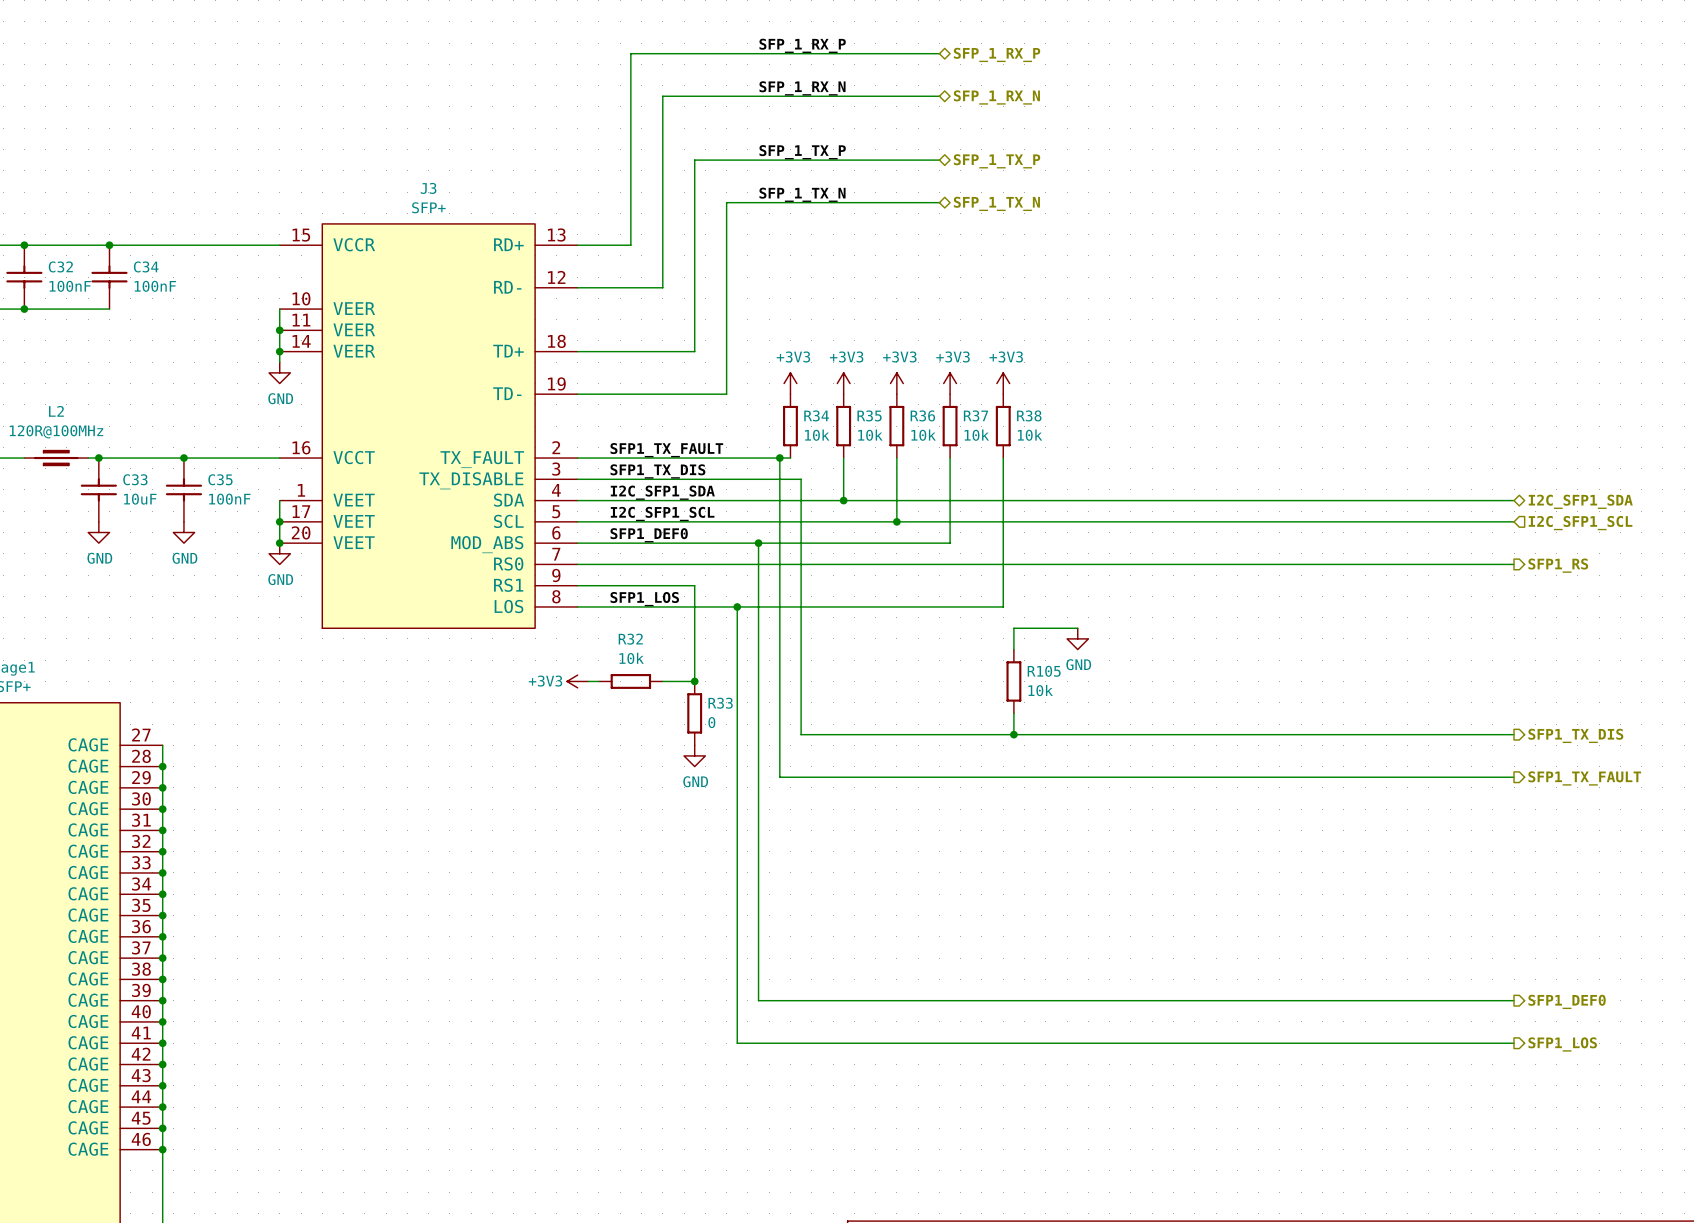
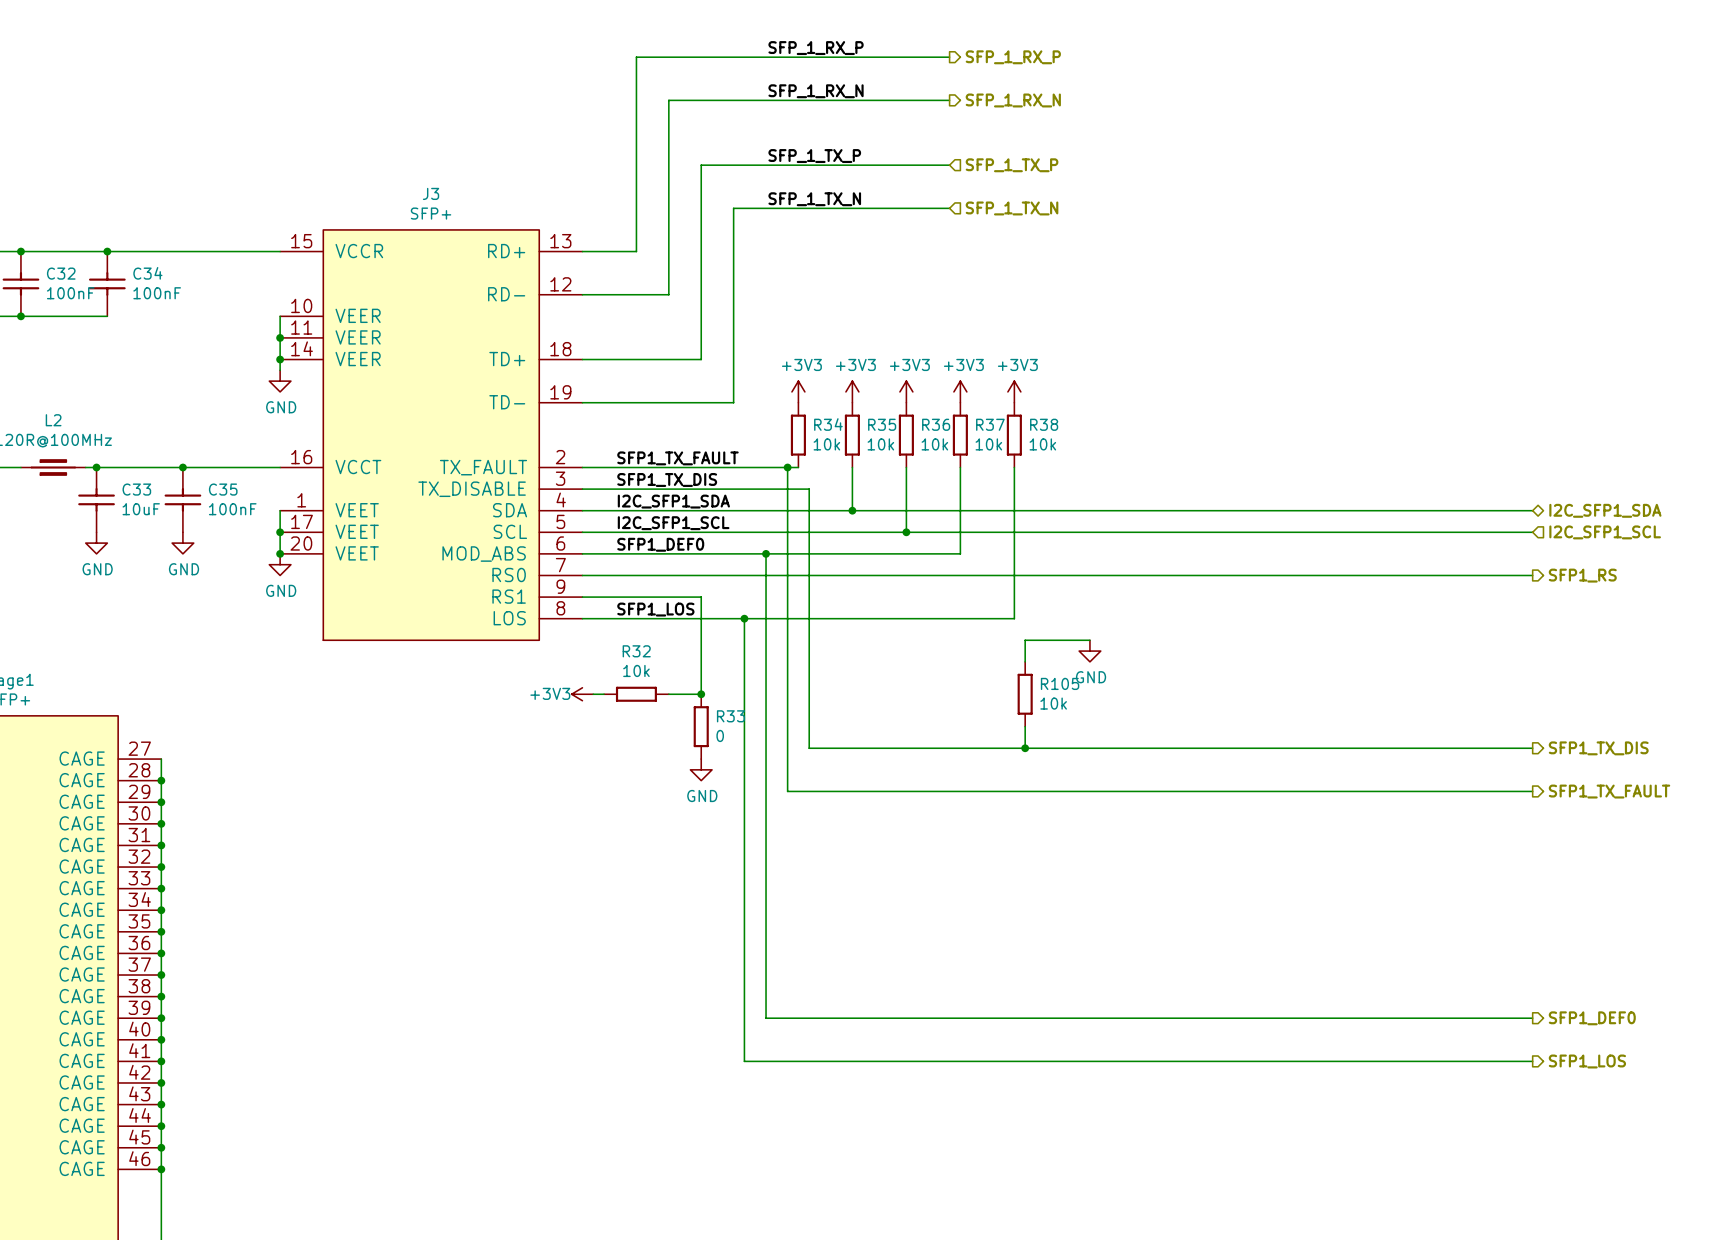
hierarchical label shape: bidirectional (997, 54) -> output (1013, 57)
hierarchical label shape: bidirectional (996, 97) -> output (1013, 100)
hierarchical label shape: bidirectional (997, 161) -> input (1012, 165)
hierarchical label shape: bidirectional (996, 203) -> input (1012, 208)

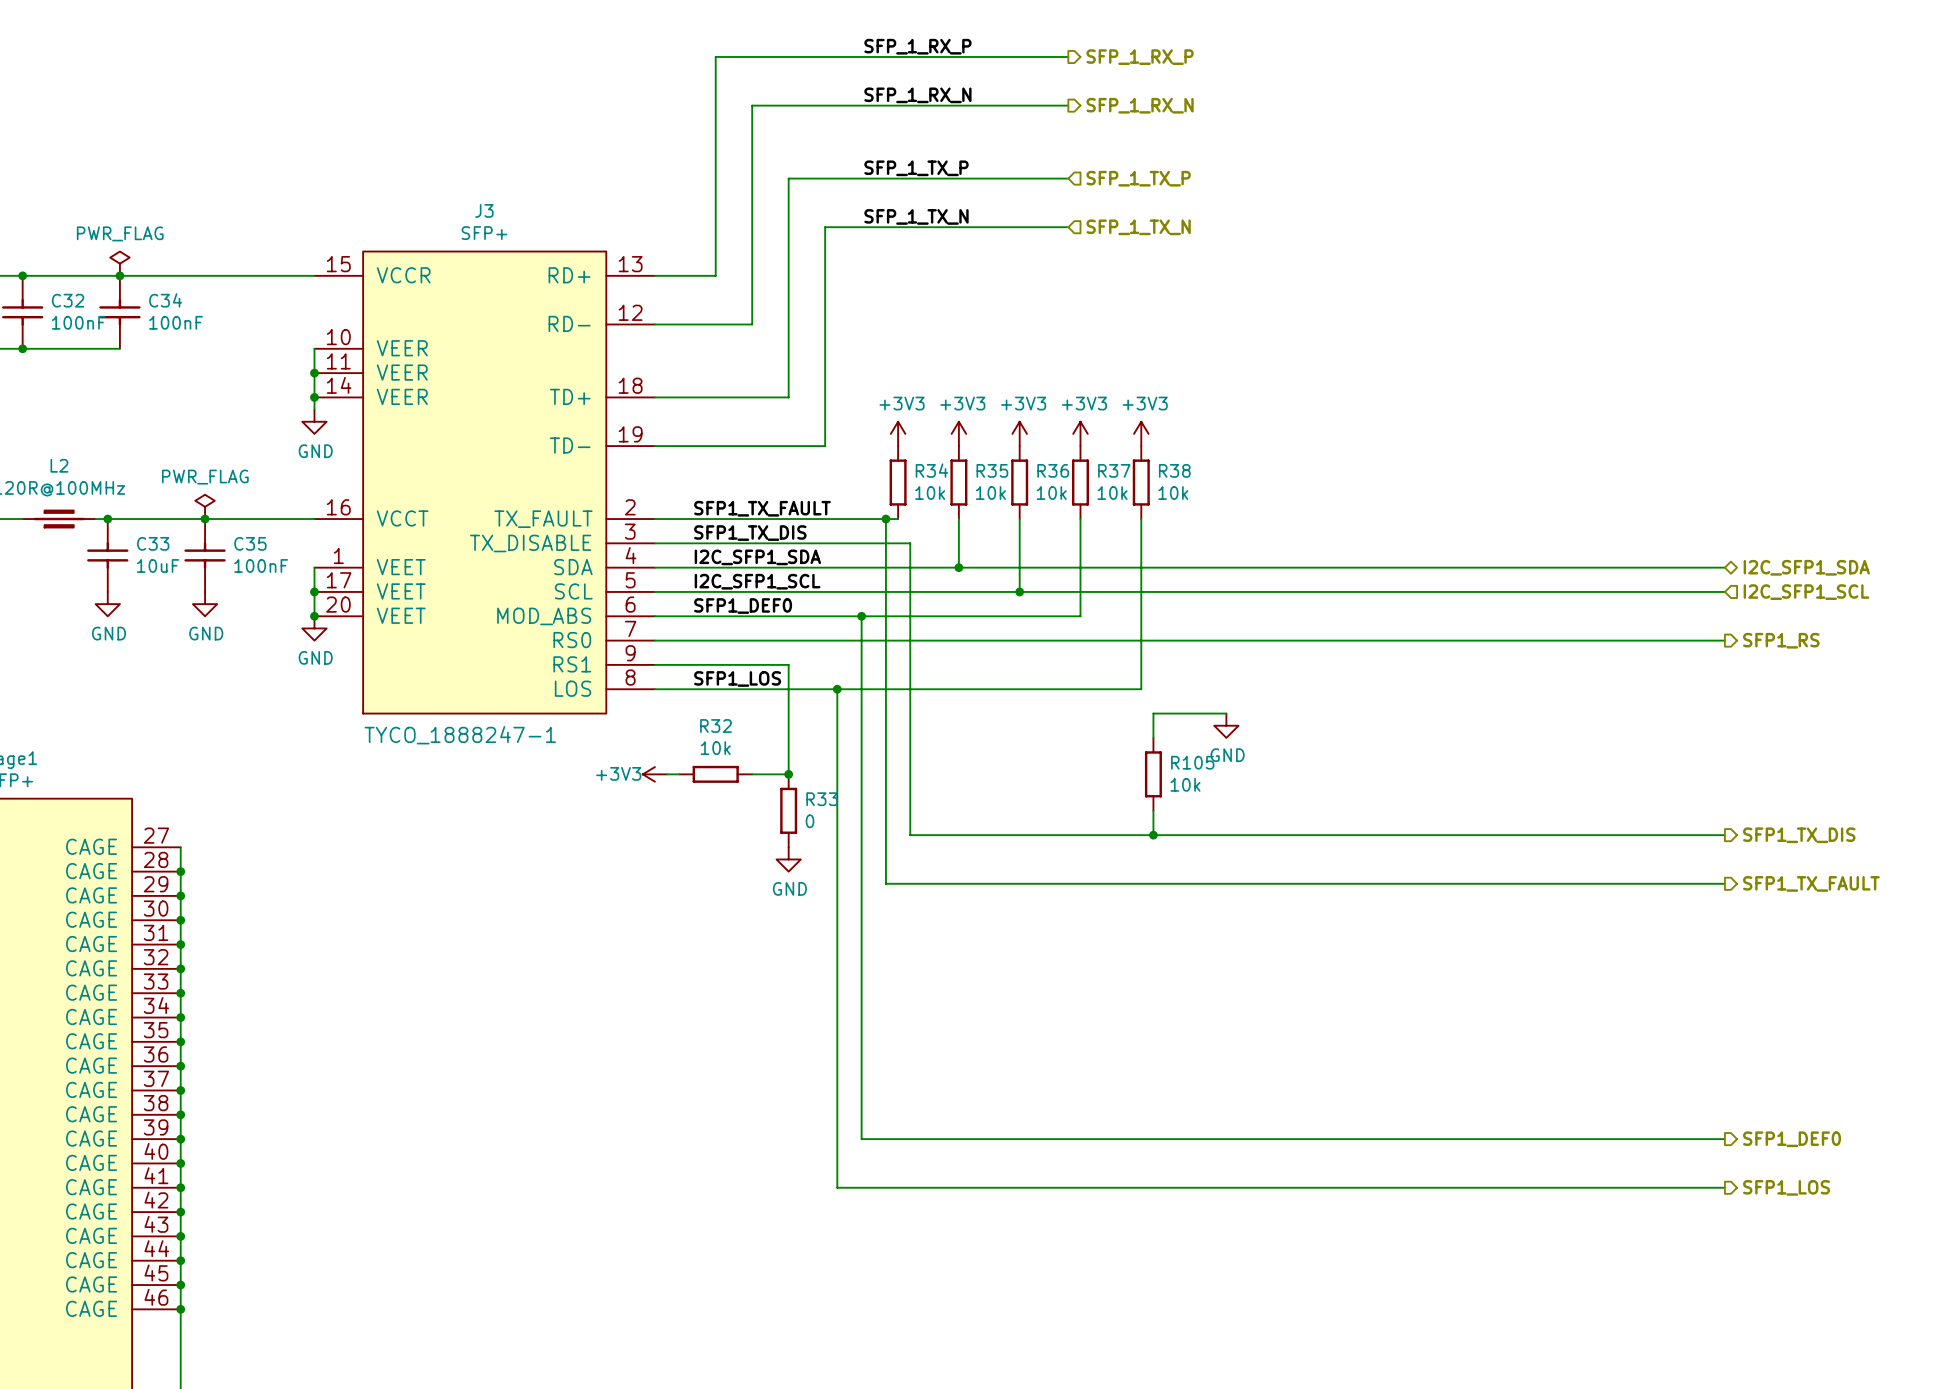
power symbol: none -> PWR_FLAG (119, 263)
power symbol: none -> PWR_FLAG (205, 506)
J3 value: none -> TYCO_1888247-1 (460, 735)

